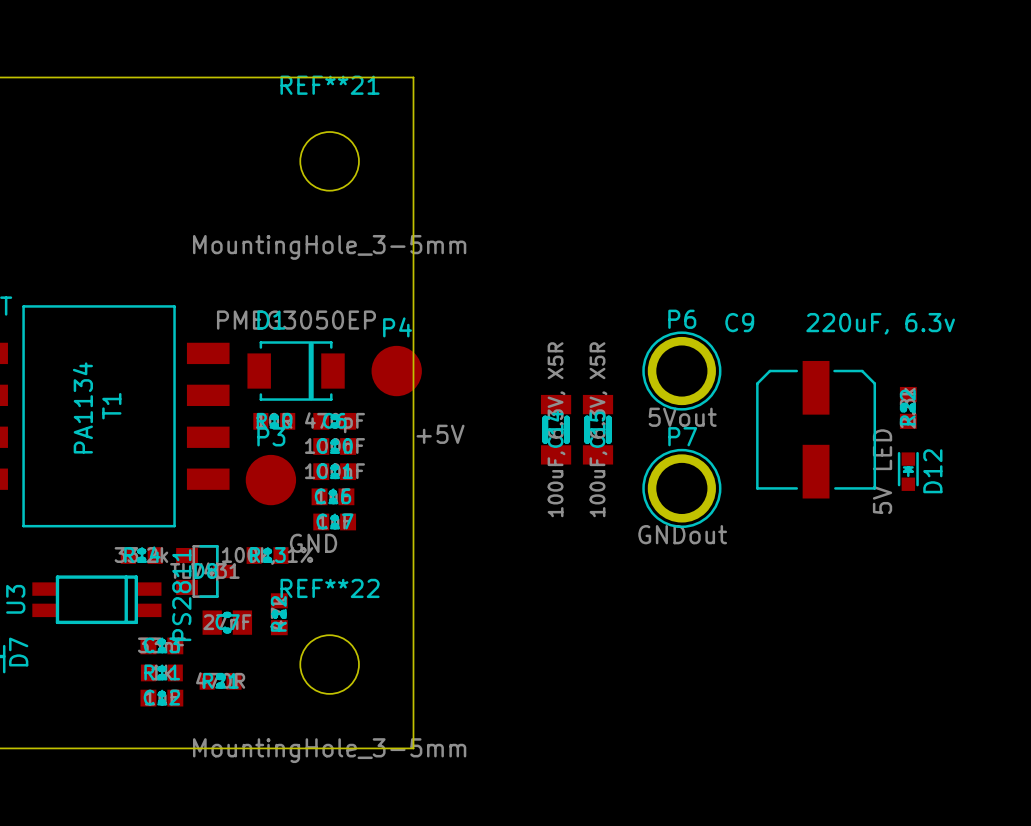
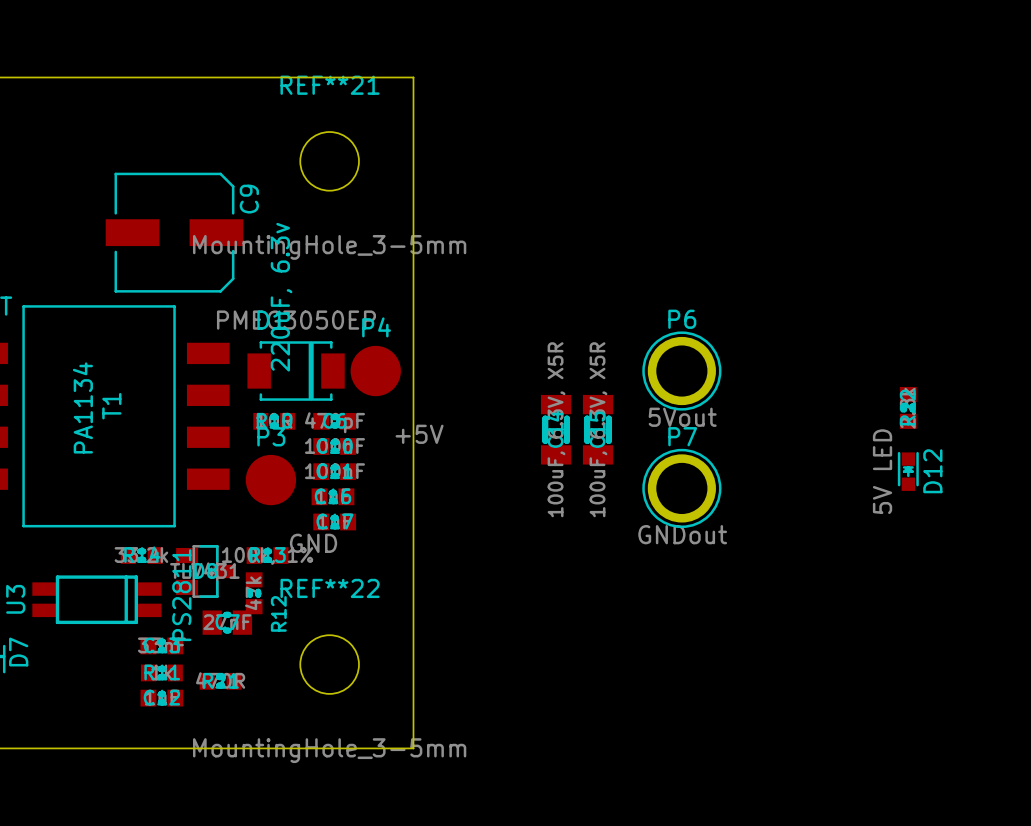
C9 name position: C9 (739, 322) -> C9 (249, 199)
P4 position: (396, 371) -> (375, 371)
C9 rotation: 0° (816, 429) -> 90° clockwise (174, 232)
C9 position: (816, 429) -> (174, 232)
R12 position: (279, 614) -> (254, 593)

